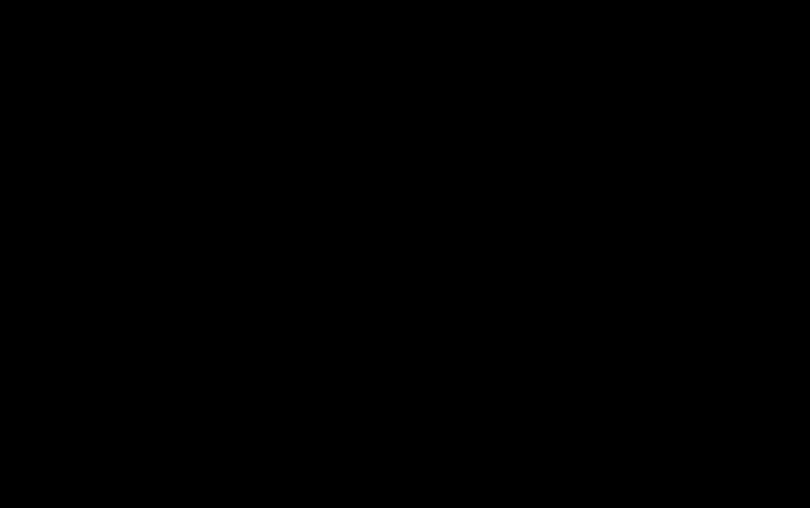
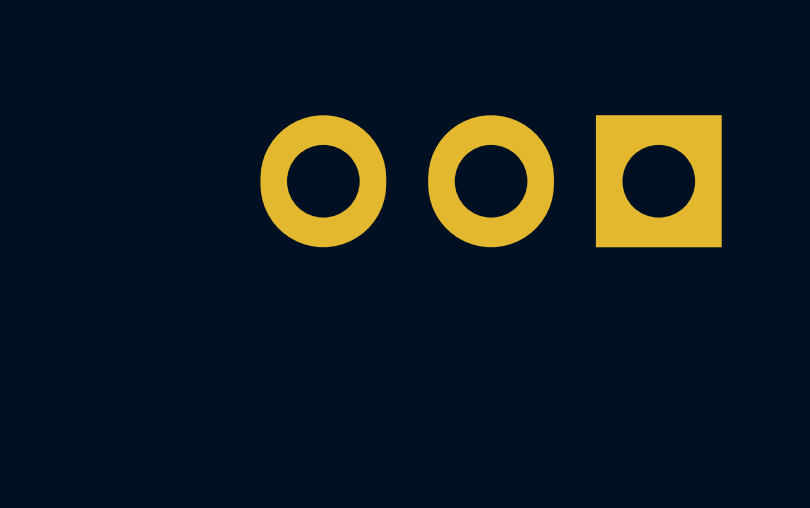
part: none -> (491, 181)

